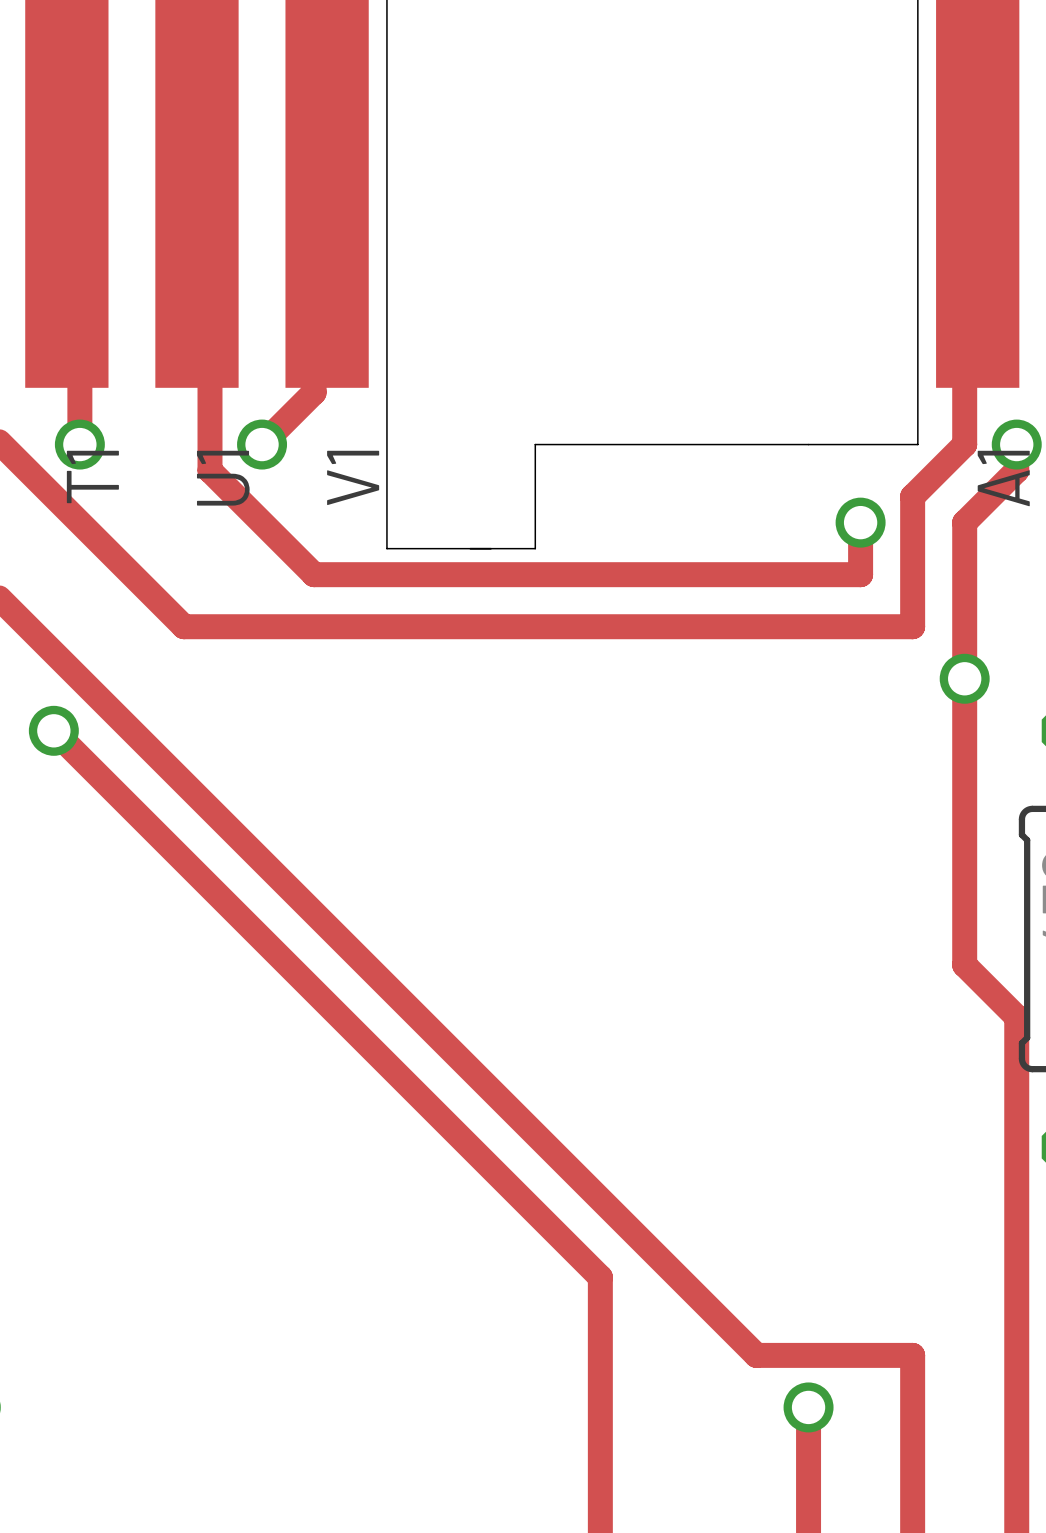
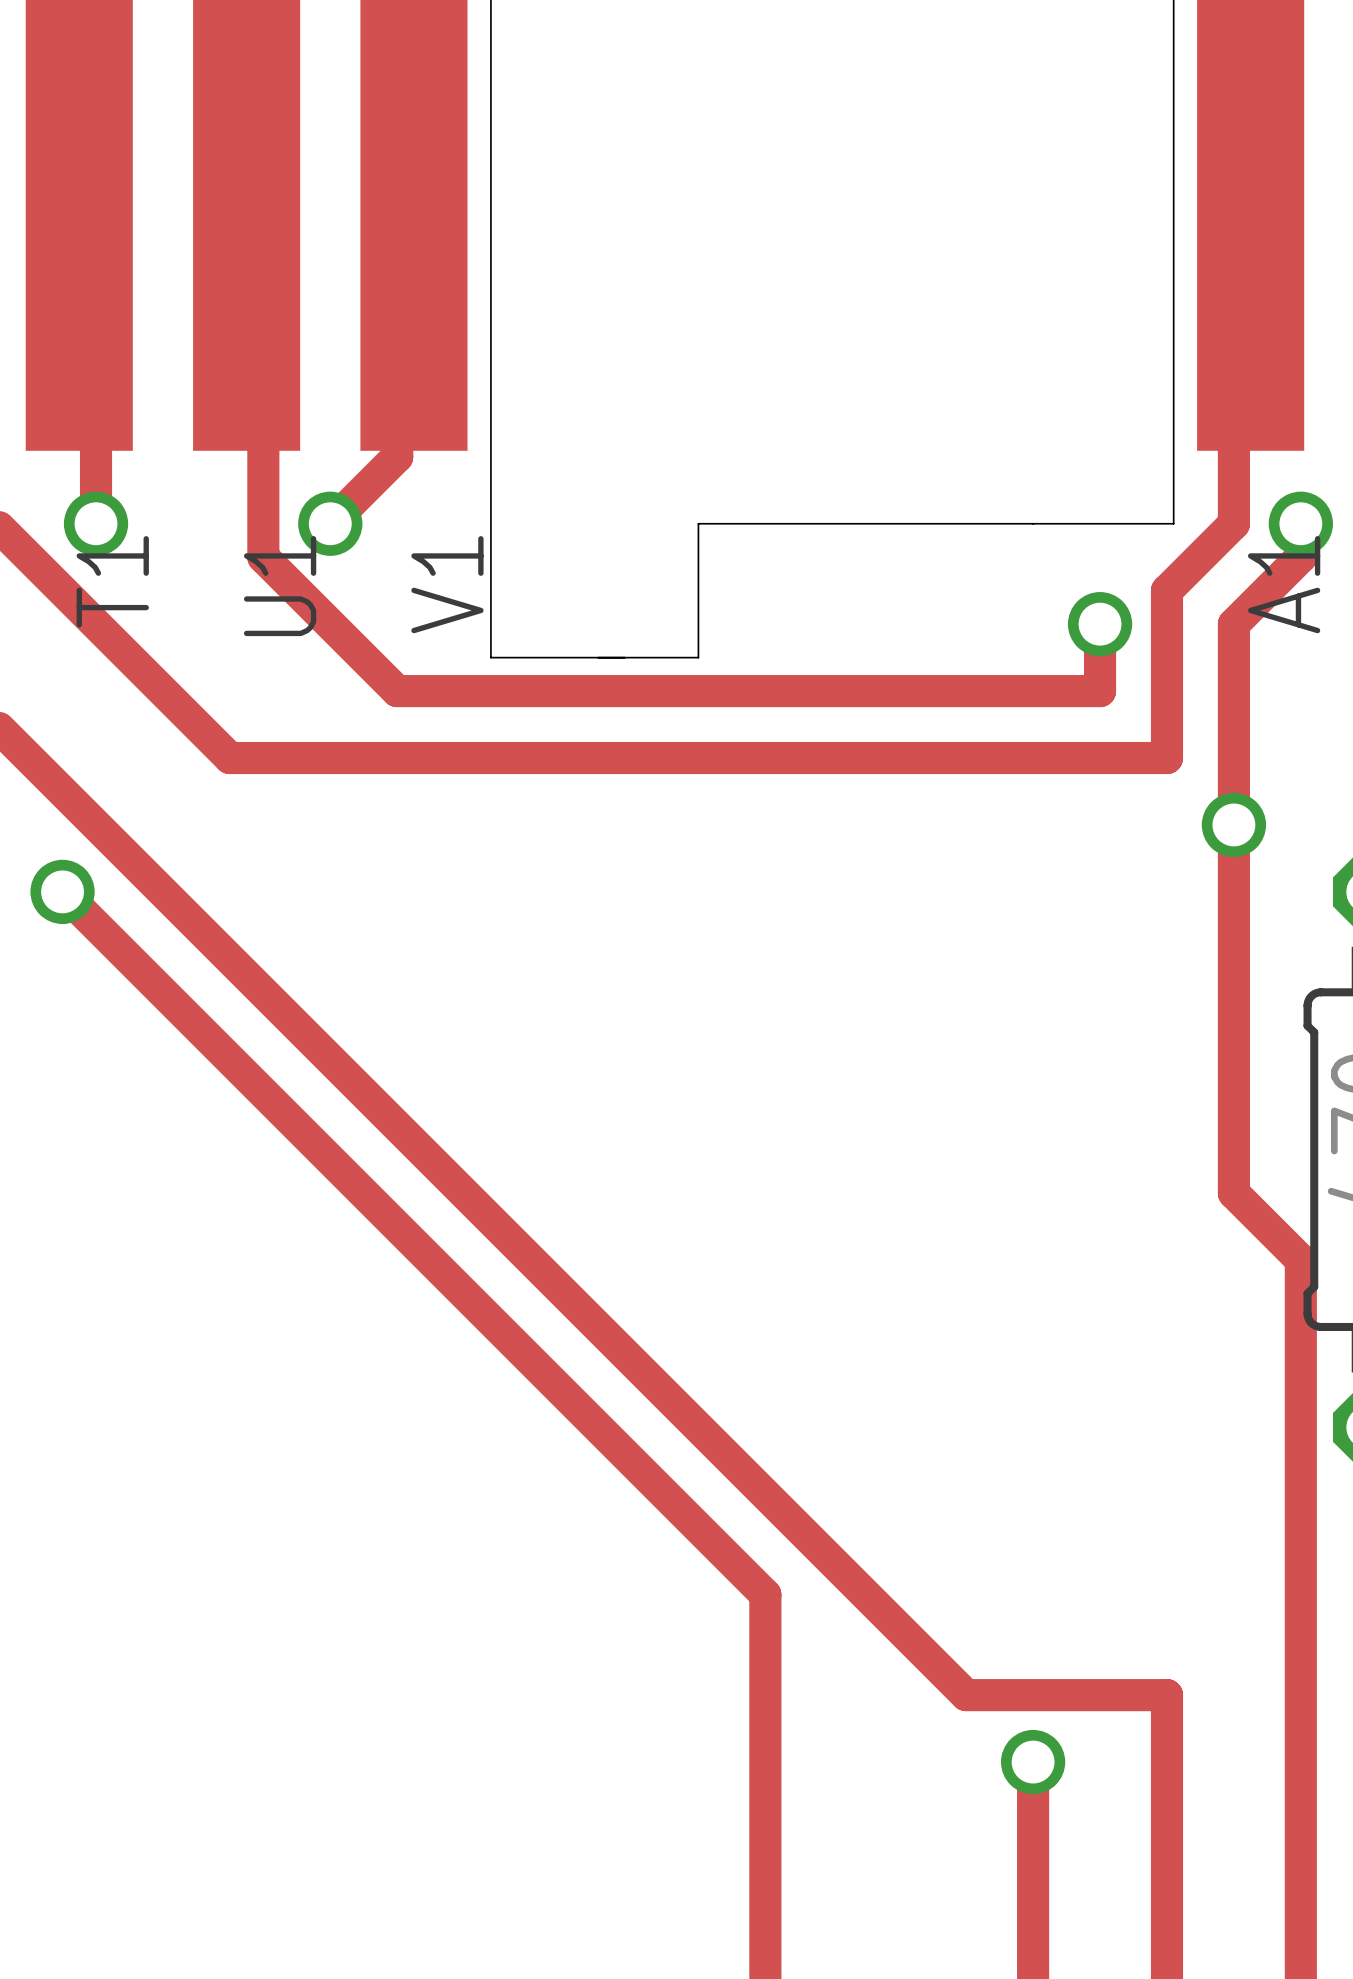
board edge: (548, 444) (535, 444) (535, 548) -> (698, 523) (698, 657) (681, 657)

